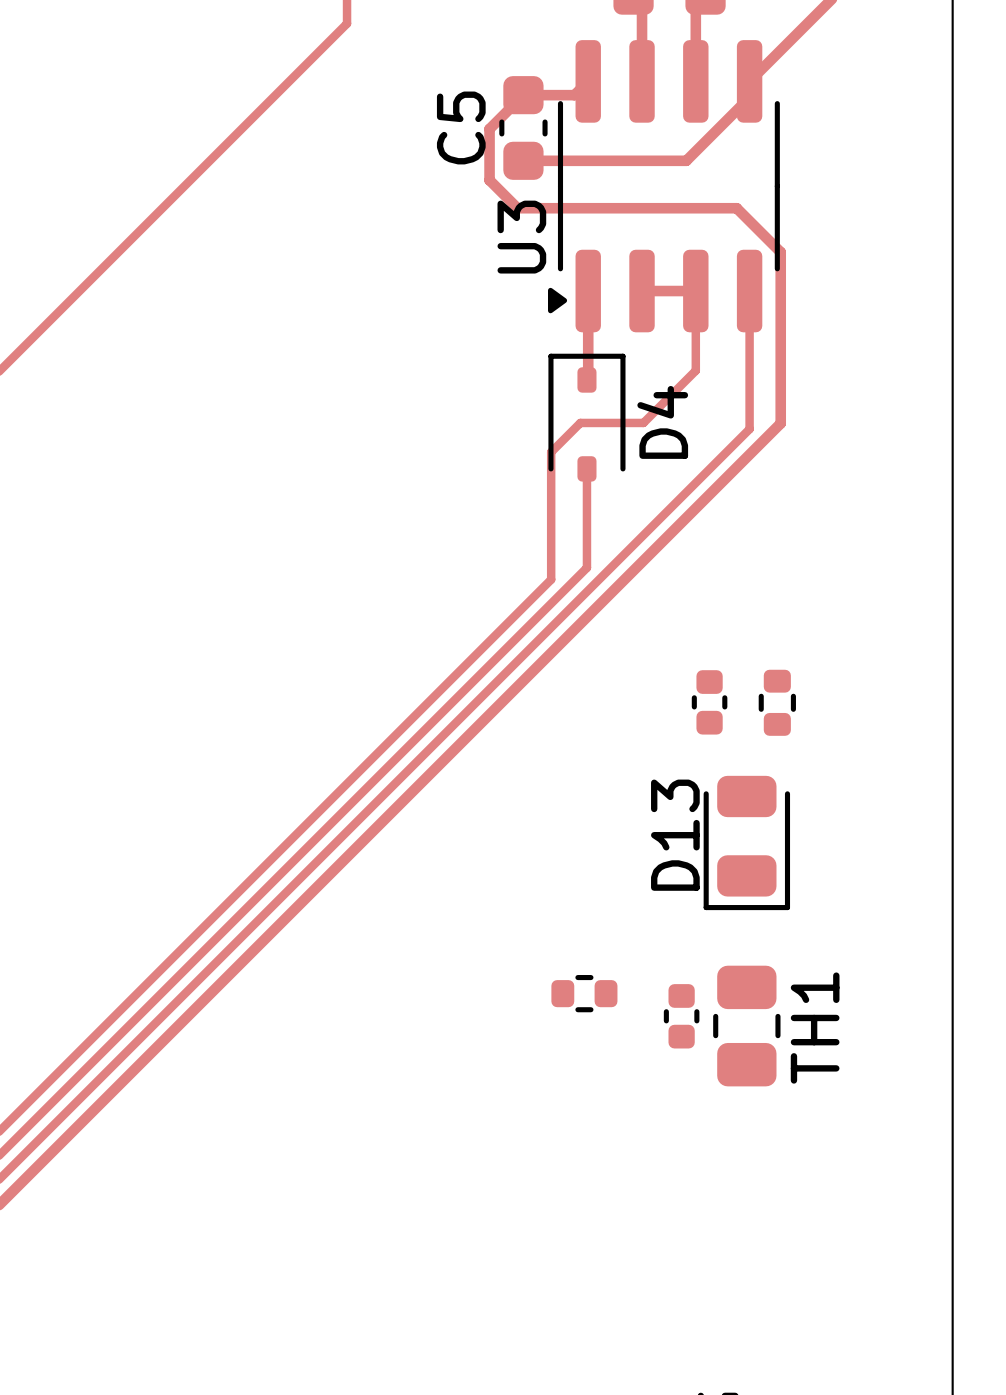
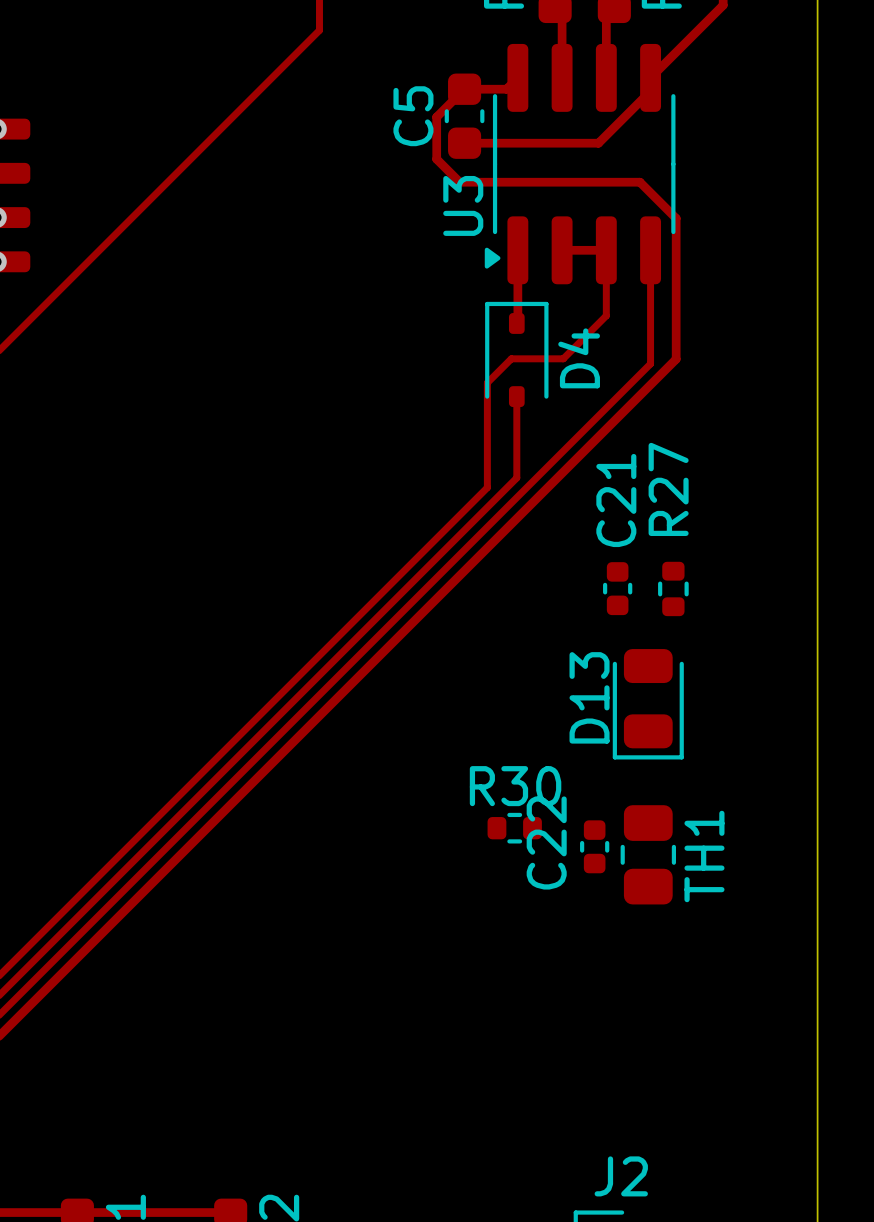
R27 name: none -> R27 (668, 489)
C21 name: none -> C21 (616, 500)
R30 name: none -> R30 (515, 786)
C22 name: none -> C22 (546, 842)

